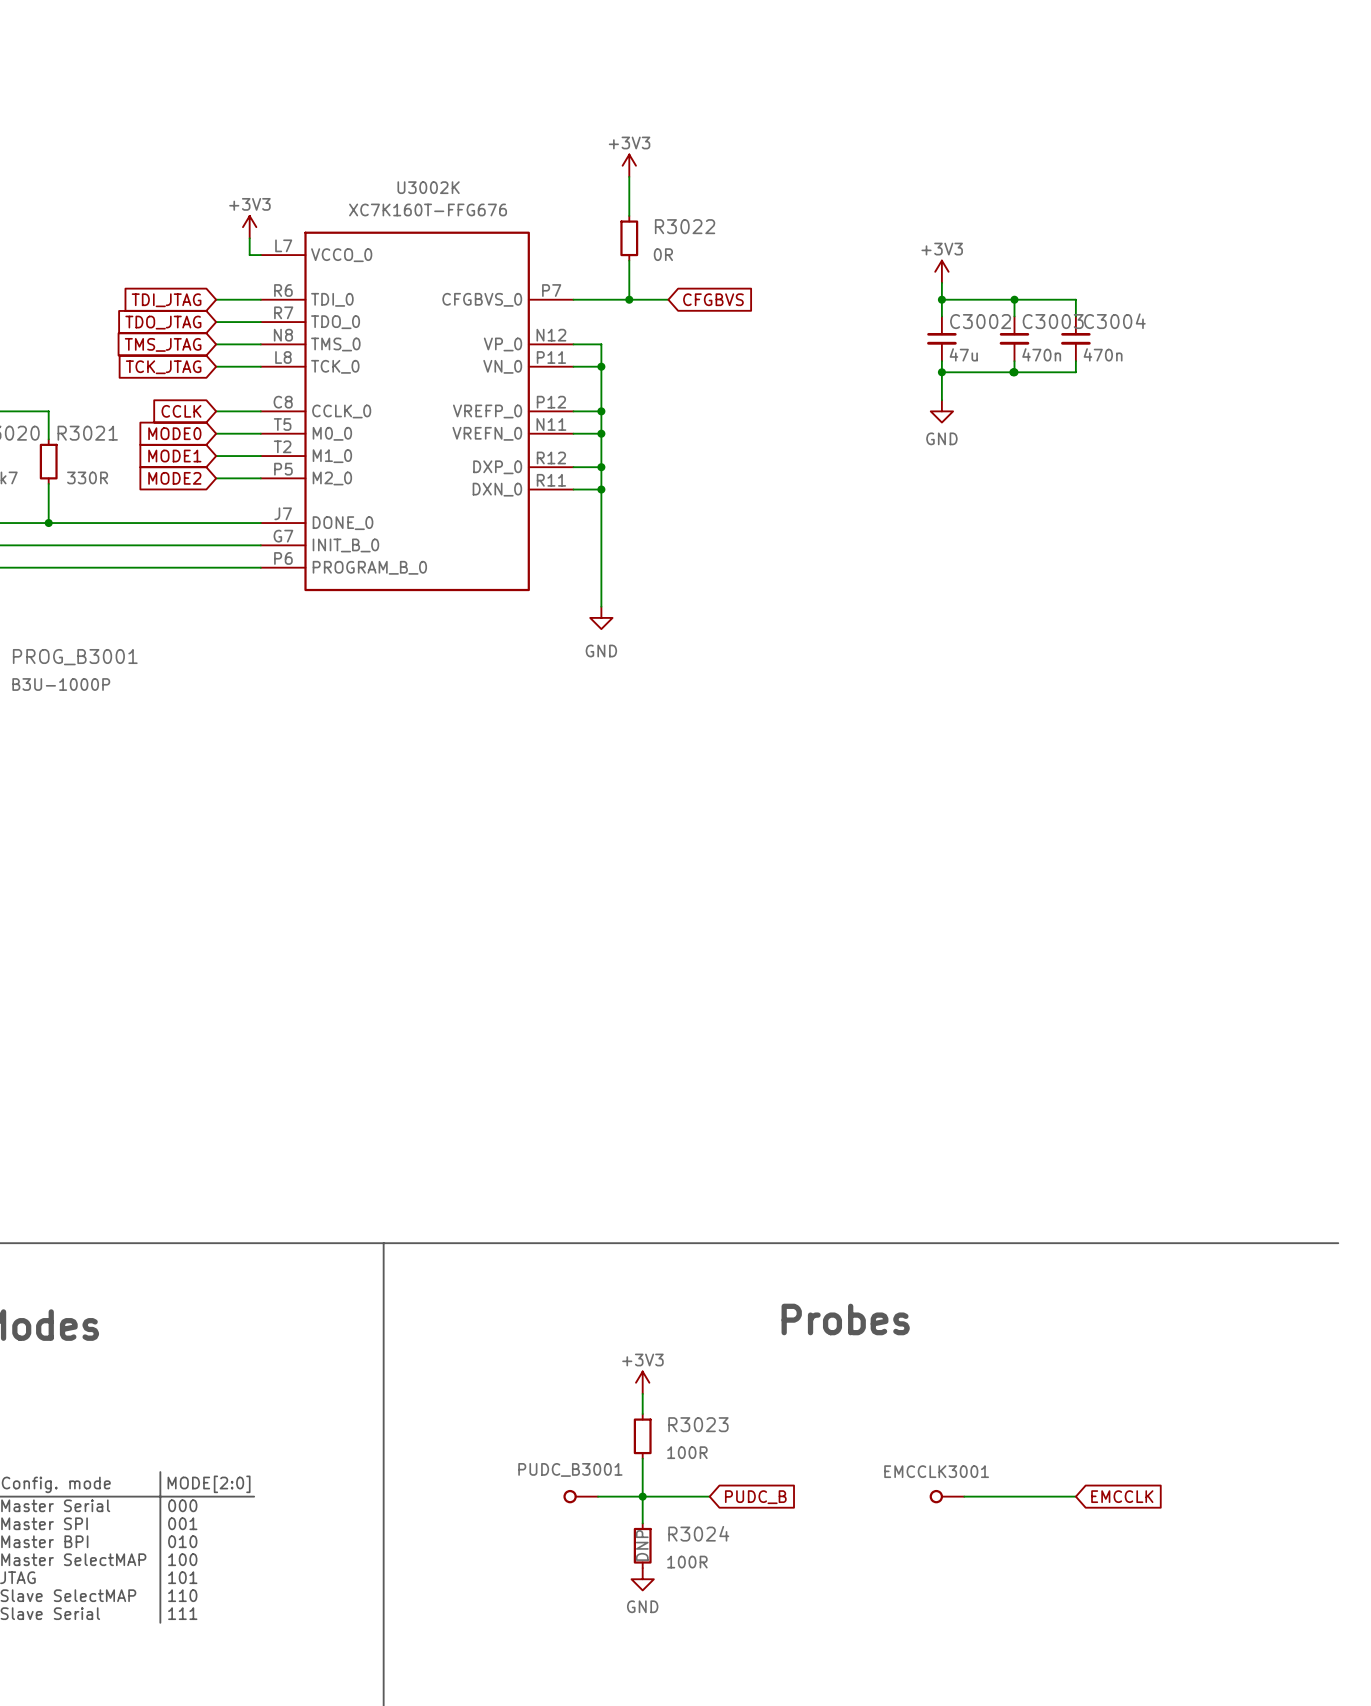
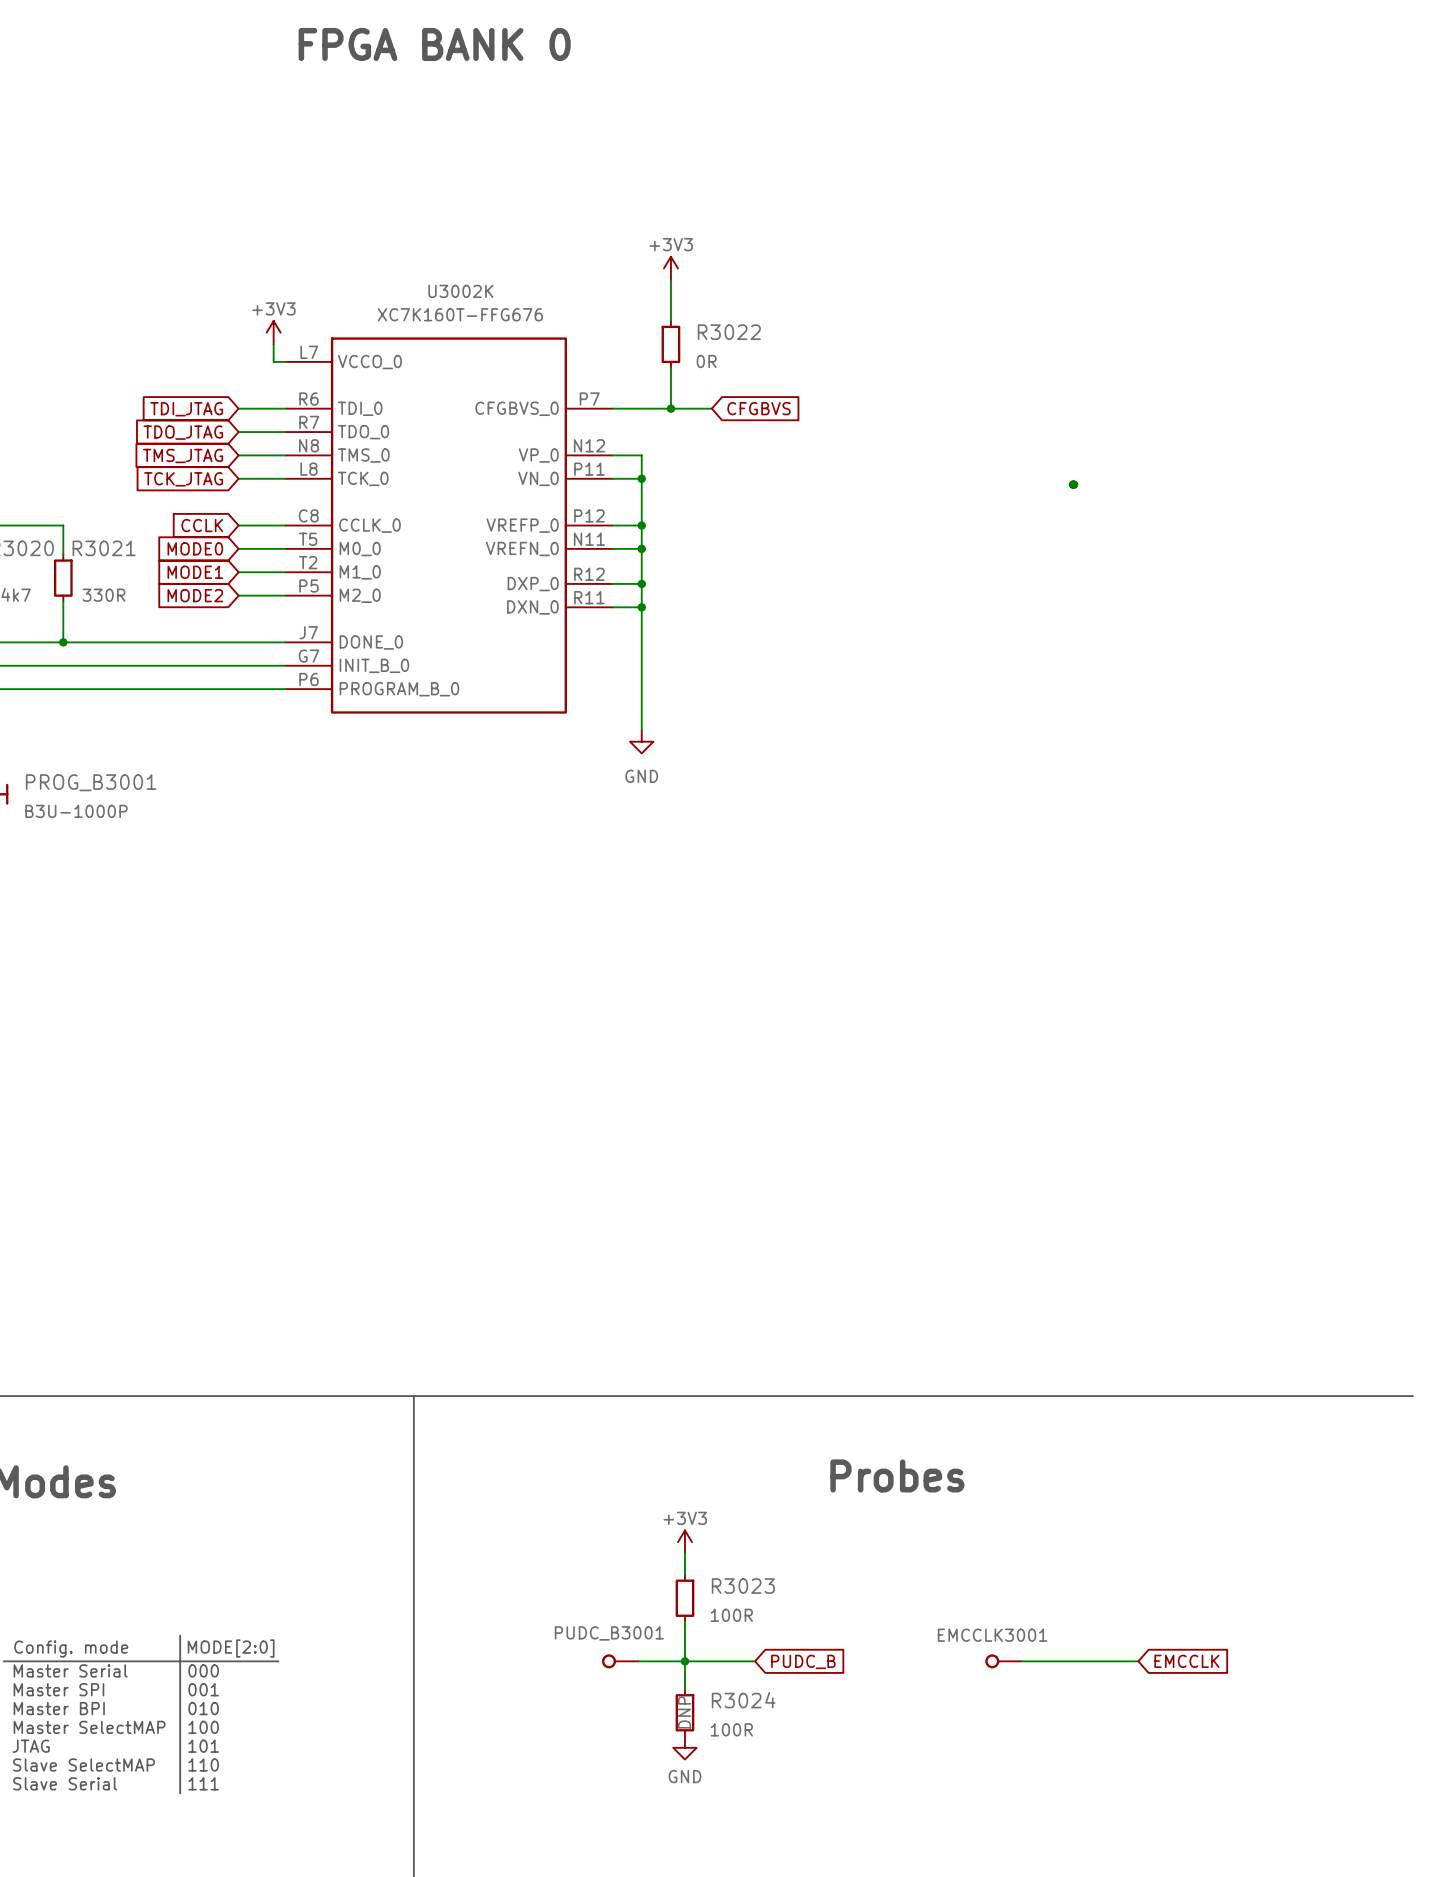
power symbol: +3V3 (941, 271) -> none
wire: (941, 282) (941, 316) -> none
wire: (941, 299) (1075, 299) (1075, 316) -> none
junction: (941, 299) -> none
wire: (1014, 299) (1014, 316) -> none
junction: (1014, 299) -> none
C3002: (941, 338) -> none
C3003: (1014, 338) -> none
C3004: (1075, 338) -> none
wire: (941, 361) (941, 400) -> none
wire: (1014, 361) (1014, 372) -> none
wire: (1075, 361) (1075, 372) (941, 372) -> none
junction: (941, 372) -> none
power symbol: GND (941, 411) -> none

